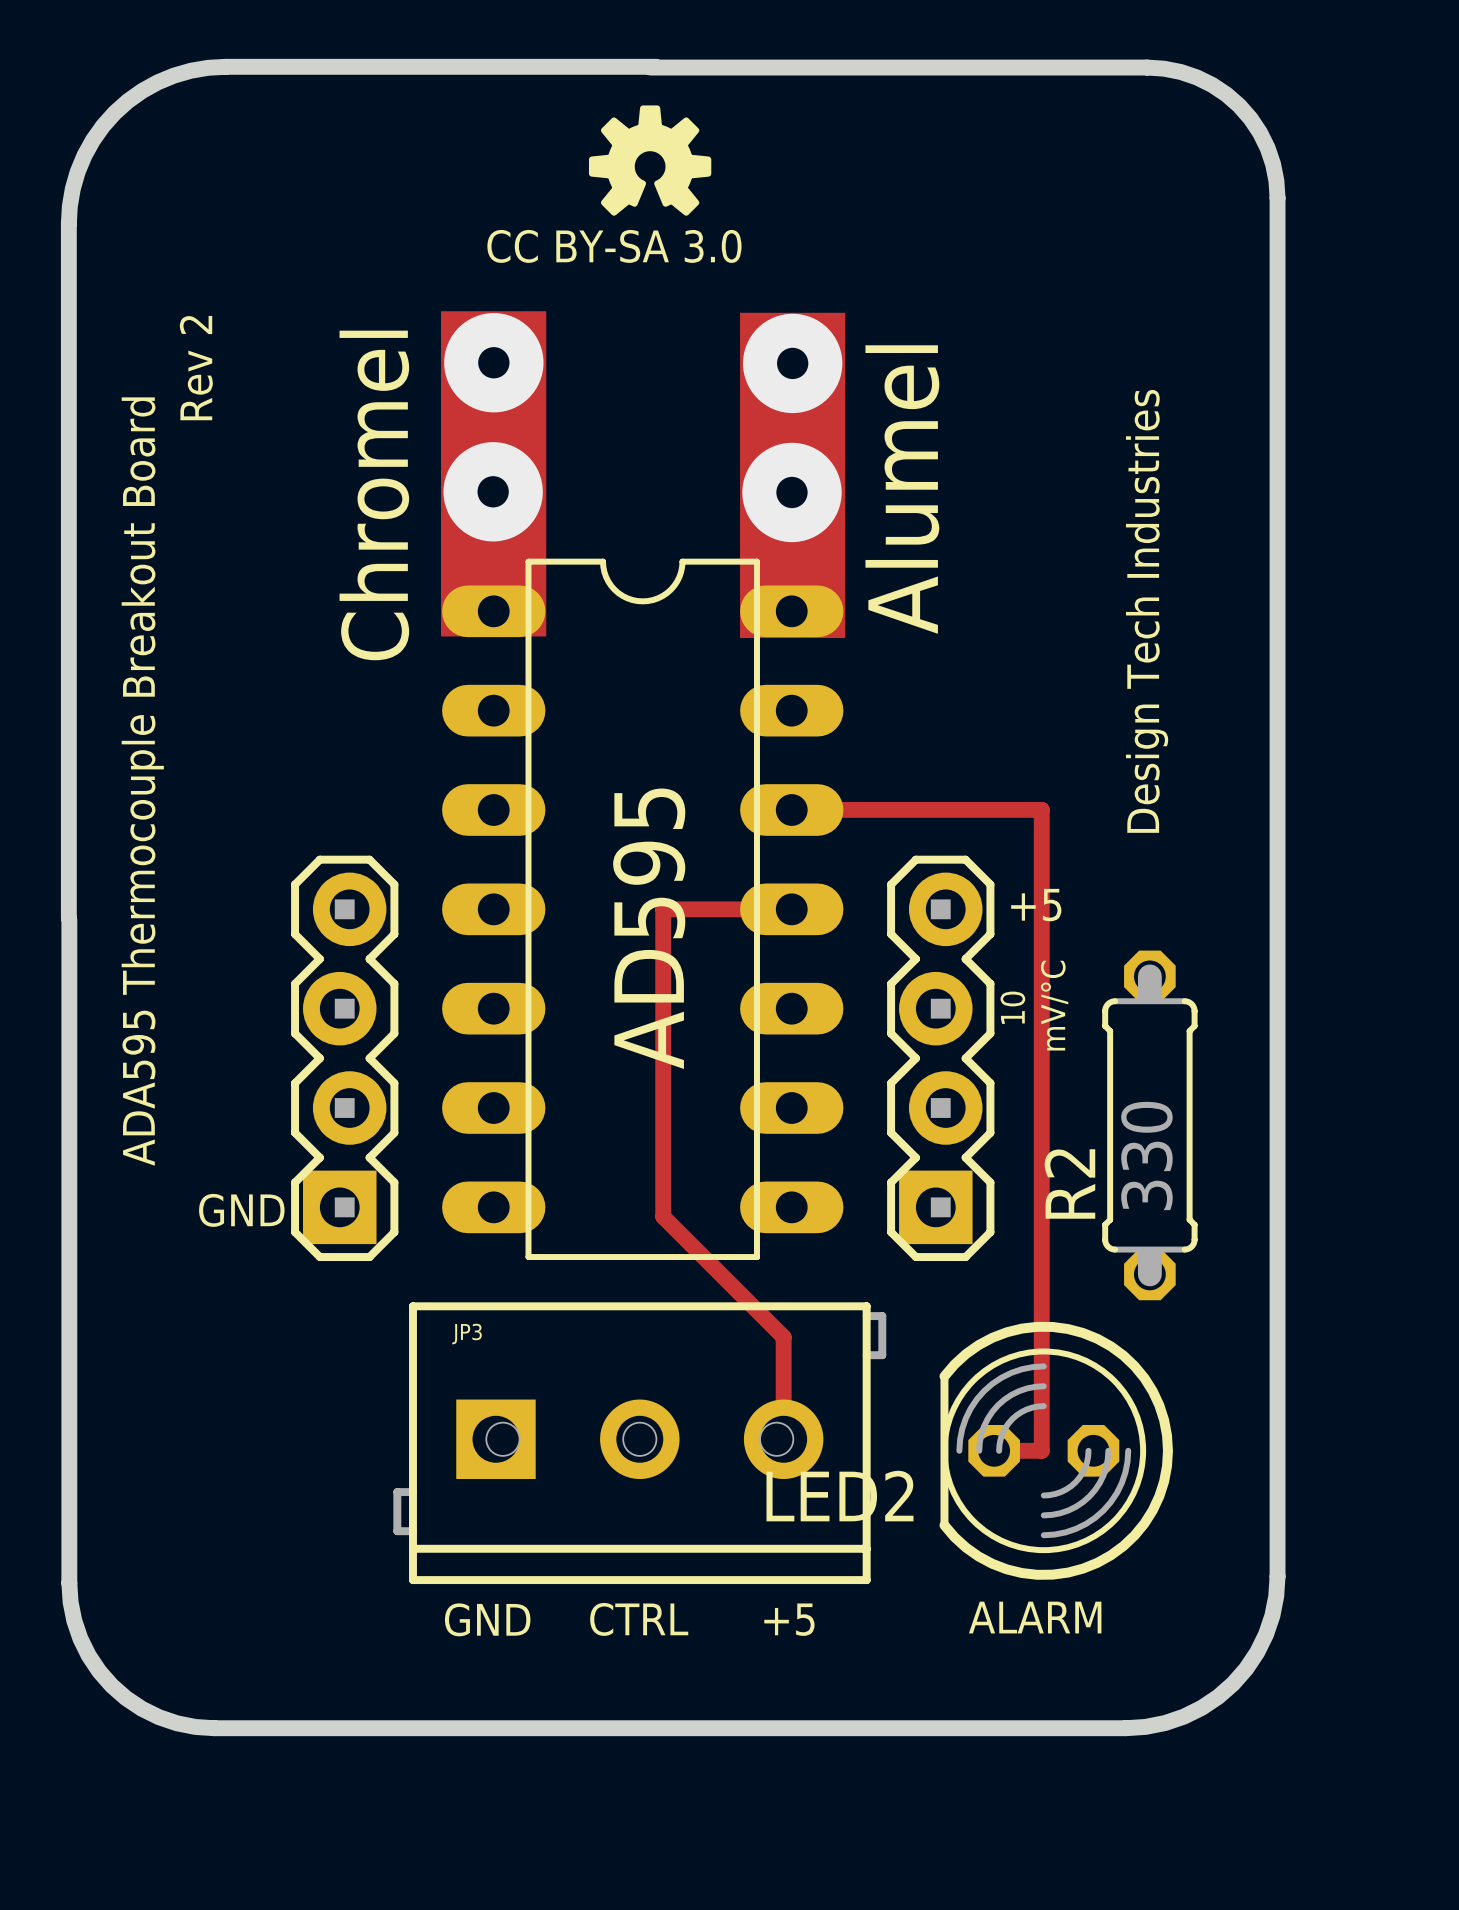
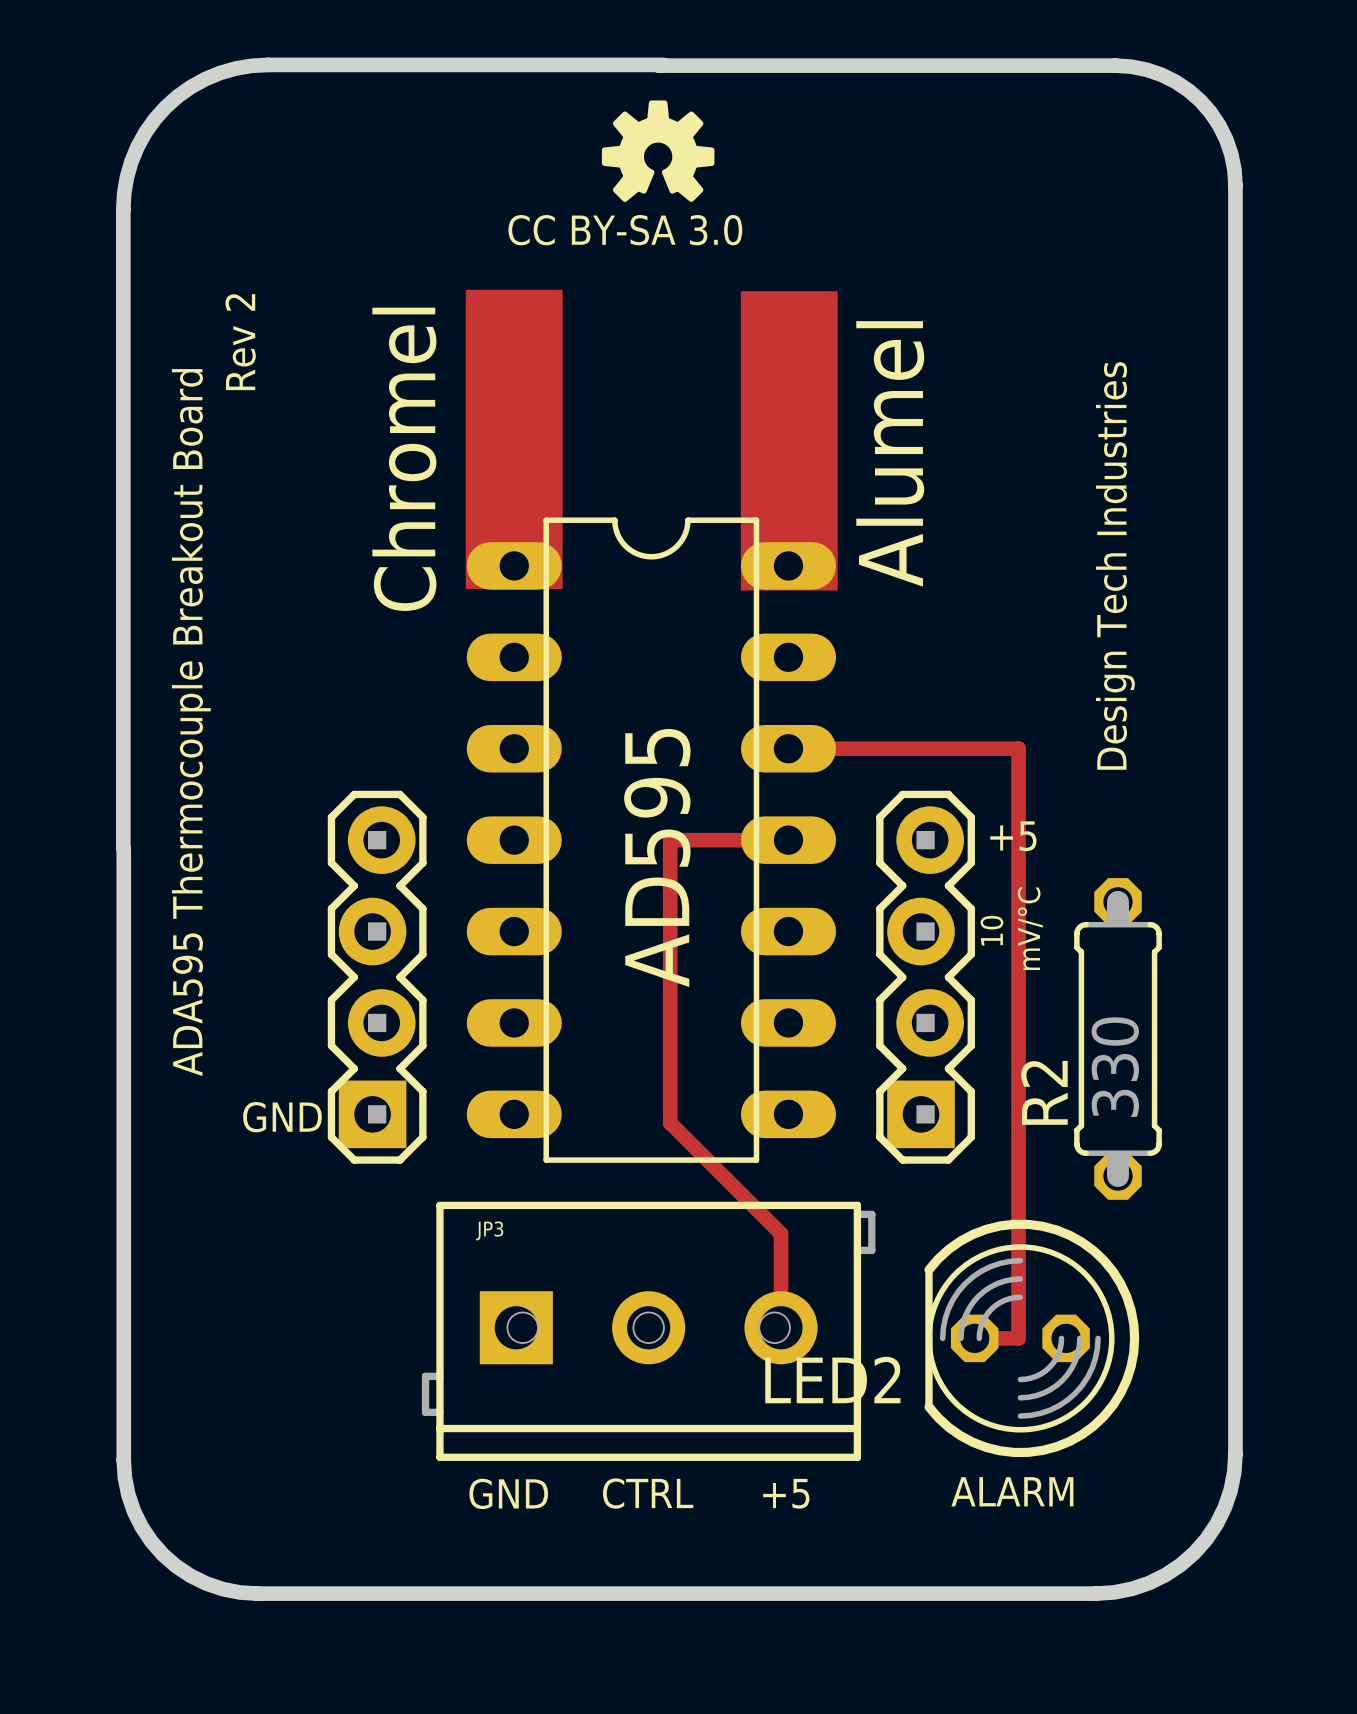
via: (493, 362) -> none
via: (792, 363) -> none
via: (493, 491) -> none
via: (791, 492) -> none

